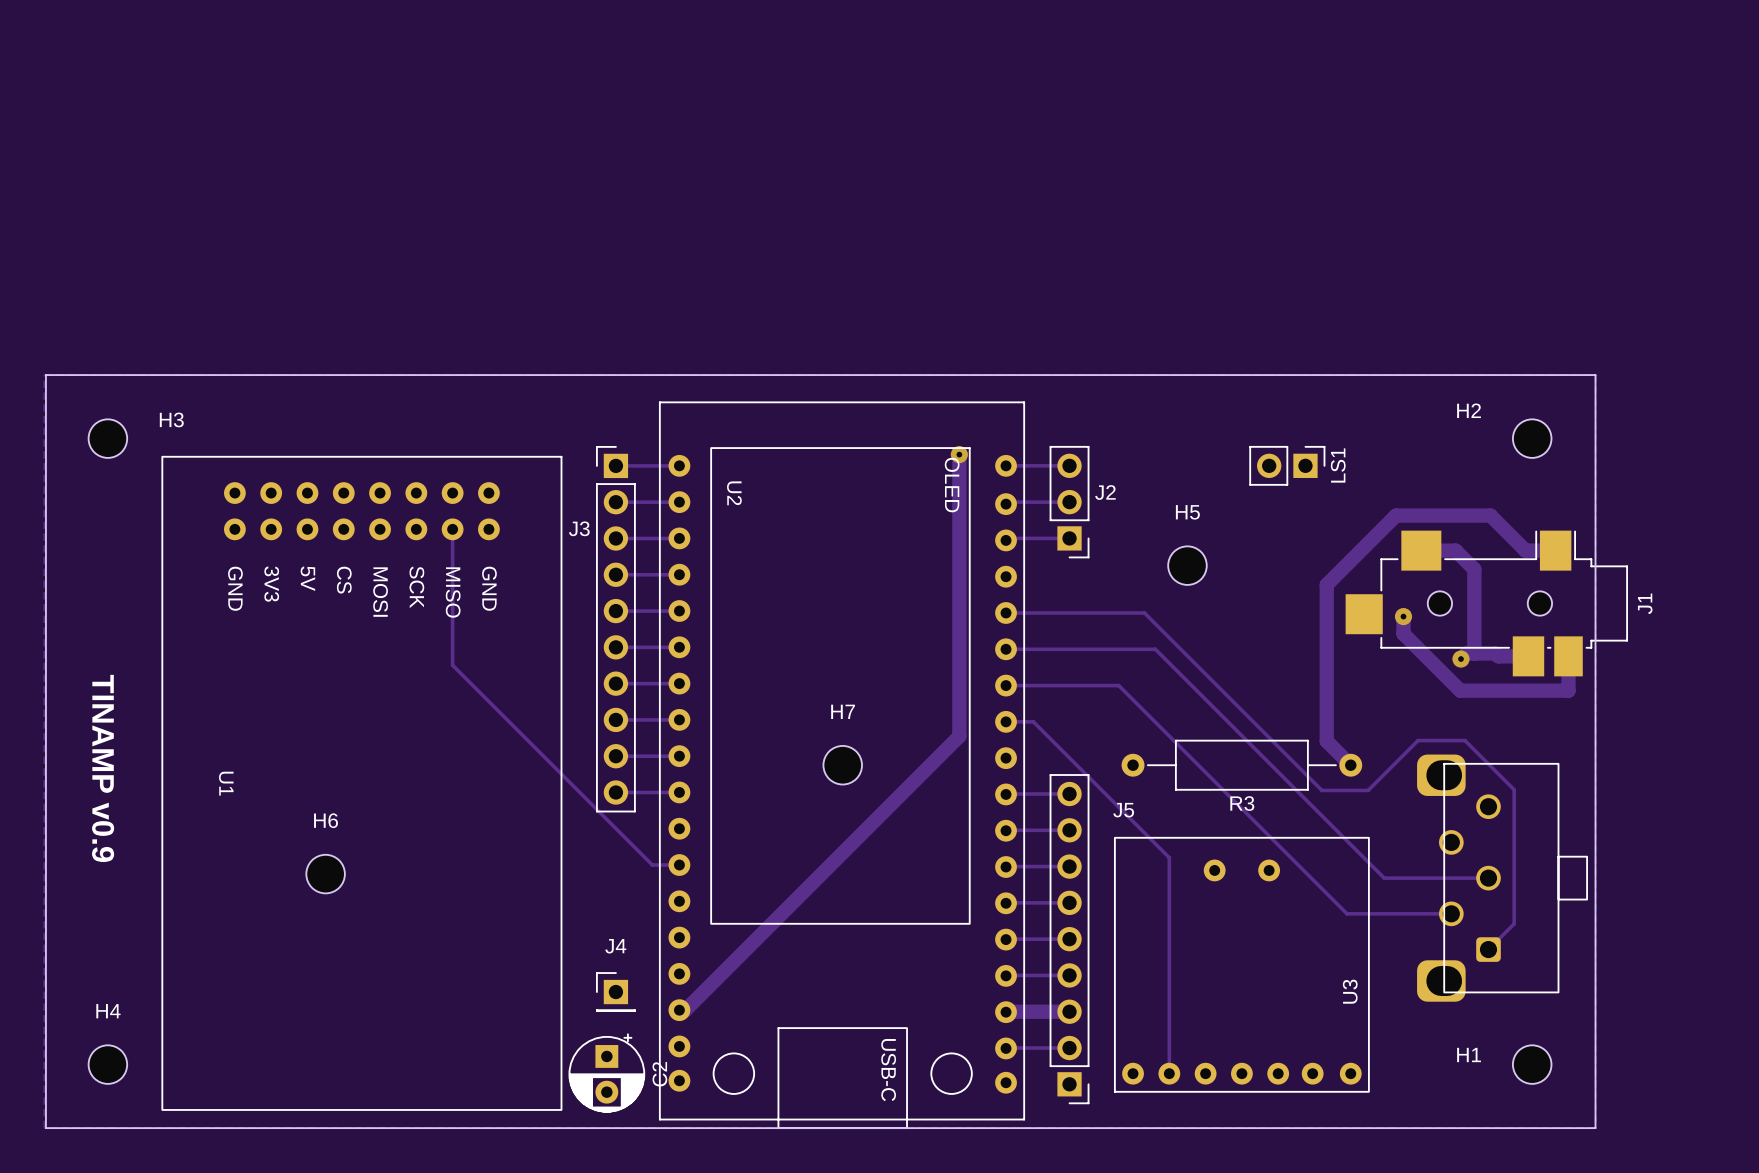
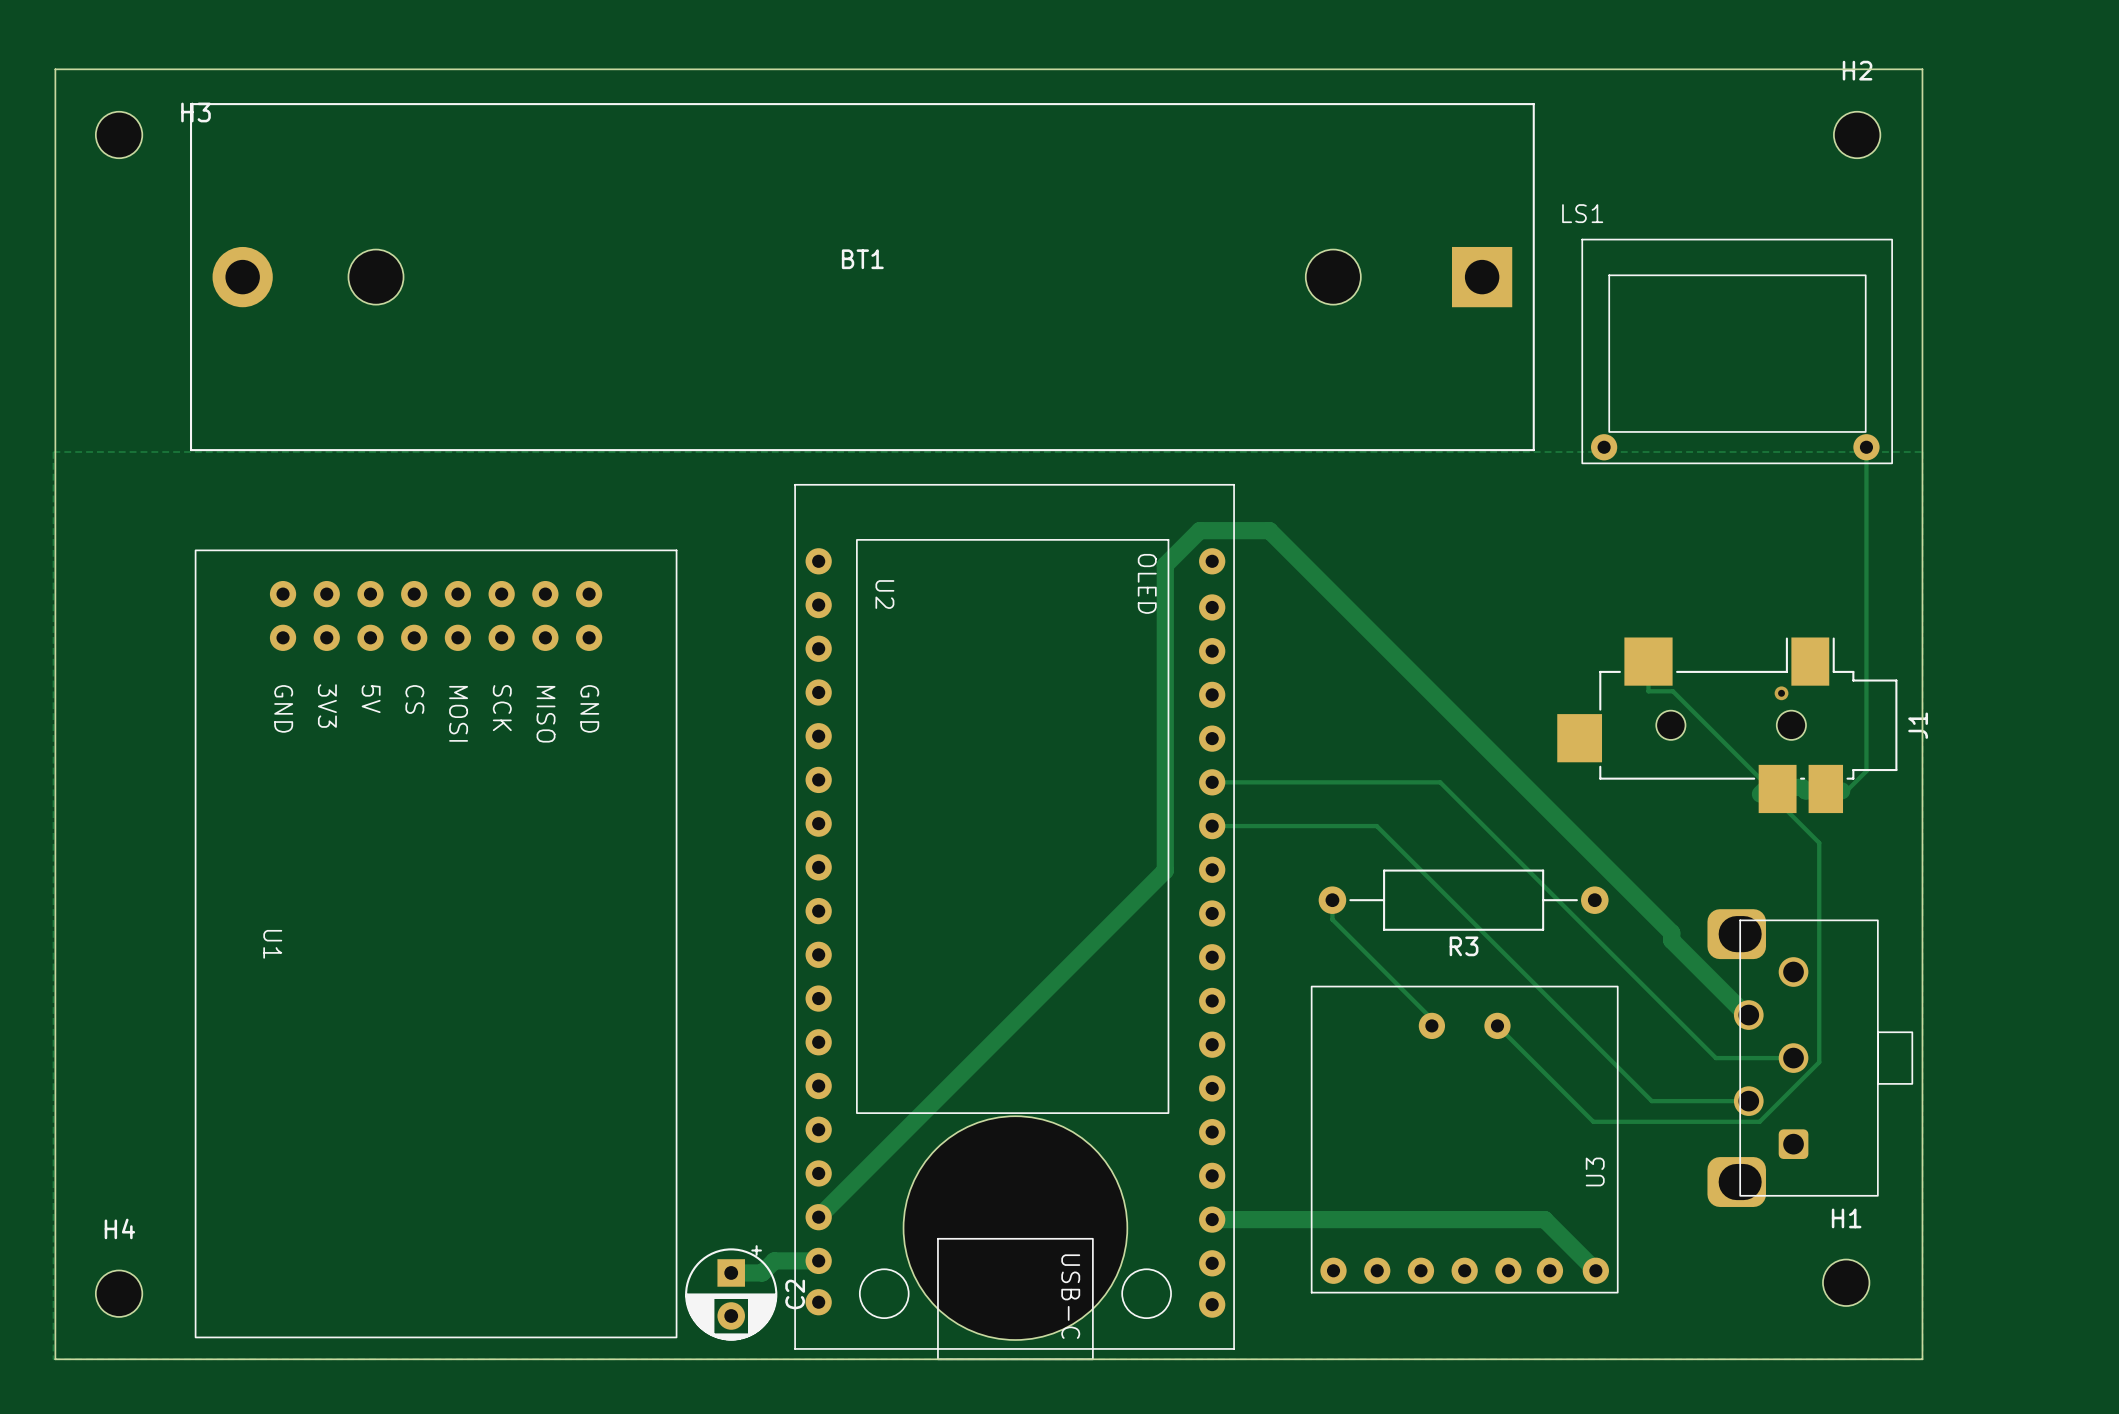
BT1: none -> (862, 277)
track: none -> (1866, 447) (1866, 771) (1848, 788) (1825, 788)
board edge: (1595, 375) (45, 375) (45, 1128) -> (1922, 451) (1922, 69) (55, 69) (55, 1359)
U2 footprint: [659, 401, 1715, 1129] -> [794, 483, 2066, 1361]
H2 name position: H2 (1469, 410) -> H2 (1857, 70)
H3 position: (107, 438) -> (119, 134)
H2 position: (1532, 438) -> (1857, 134)
LS1 footprint: [1249, 445, 1326, 486] -> [1581, 238, 1893, 465]
track: (959, 454) (959, 736) (685, 1010) (679, 1010) -> (1748, 1015) (1746, 1015) (1671, 940) (1671, 932) (1269, 530) (1199, 530) (1165, 565) (1165, 870) (818, 1217)
via: (959, 454) -> none
track: (615, 465) (679, 465) -> none
track: (1006, 465) (1069, 465) -> none
LS1 name position: LS1 (1338, 465) -> LS1 (1582, 213)
track: (615, 502) (679, 502) -> none
track: (1069, 502) (1008, 502) (1006, 504) -> none
J2: (1069, 502) -> none
track: (452, 529) (452, 665) (652, 865) (679, 865) -> none
track: (615, 538) (679, 538) -> none
track: (1069, 538) (1008, 538) (1006, 540) -> none
track: none -> (1648, 661) (1648, 691) (1672, 691) (1765, 783) (1765, 788) (1819, 842) (1819, 1062) (1759, 1121) (1593, 1121) (1497, 1025)
track: (1421, 550) (1455, 550) (1474, 569) (1474, 653) -> none
track: (1555, 550) (1525, 550) (1490, 515) (1395, 515) (1326, 584) (1326, 741) (1350, 765) -> none
H5: (1187, 565) -> none
track: (615, 574) (679, 574) -> none
via: none -> (1781, 693)
J1 position: (1486, 603) -> (1727, 725)
track: (615, 611) (679, 611) -> none
track: (1006, 612) (1144, 612) (1321, 790) (1368, 790) (1418, 740) (1465, 740) (1514, 789) (1514, 923) (1488, 949) -> none
track: (1403, 616) (1403, 633) (1460, 690) (1568, 690) (1568, 656) -> none
via: (1403, 616) -> none
J3: (615, 629) -> none
track: (615, 647) (679, 647) -> none
track: (1155, 649) (1384, 878) (1424, 878) -> (1392, 782) (1440, 782) (1715, 1058)
via: (1460, 659) -> none
track: (615, 683) (679, 683) -> none
track: (1118, 685) (1347, 913) (1370, 913) -> (1348, 826) (1376, 826) (1651, 1101)
track: (615, 719) (679, 719) -> none
track: (1006, 721) (1033, 721) (1169, 857) (1169, 1073) -> none
track: none -> (1332, 900) (1332, 919) (1431, 1019) (1431, 1025)
track: (615, 756) (679, 756) -> none
H7: (842, 765) -> none
R3 position: (1241, 765) -> (1463, 900)
text: TINAMP v0.9 (103, 768) -> none
track: (615, 792) (679, 792) -> none
track: (1069, 794) (1006, 794) -> none
track: (1069, 830) (1006, 830) -> none
track: (1069, 866) (1006, 867) -> none
H6: (325, 874) -> none
track: (1069, 902) (1006, 903) -> none
track: (1069, 939) (1006, 939) -> none
J5: (1069, 939) -> none
U3 position: (1241, 964) -> (1464, 1139)
track: (1069, 975) (1006, 975) -> none
J4: (615, 992) -> none
track: (1069, 1011) (1006, 1012) -> (1595, 1270) (1544, 1219) (1212, 1219)
track: none -> (818, 1260) (774, 1260) (762, 1272) (731, 1272)
track: (1069, 1048) (1006, 1048) -> none
H1 name position: H1 (1469, 1054) -> H1 (1846, 1218)
H4 position: (107, 1064) -> (119, 1293)

